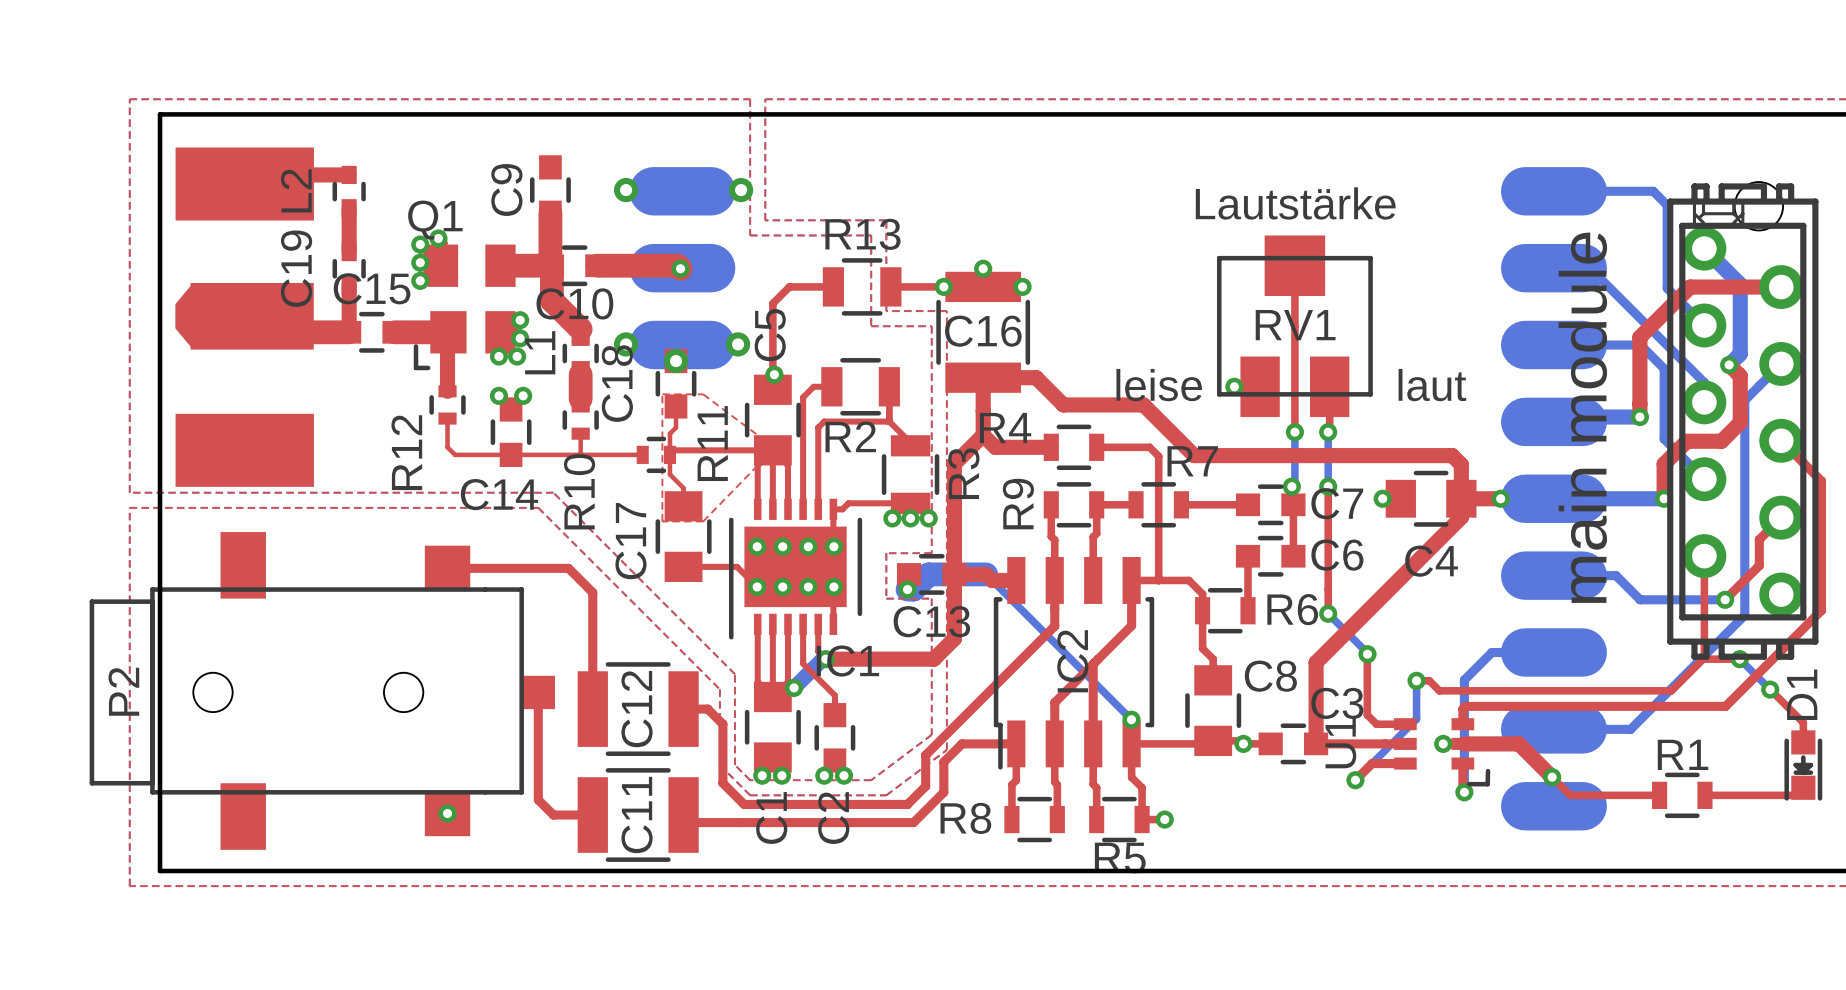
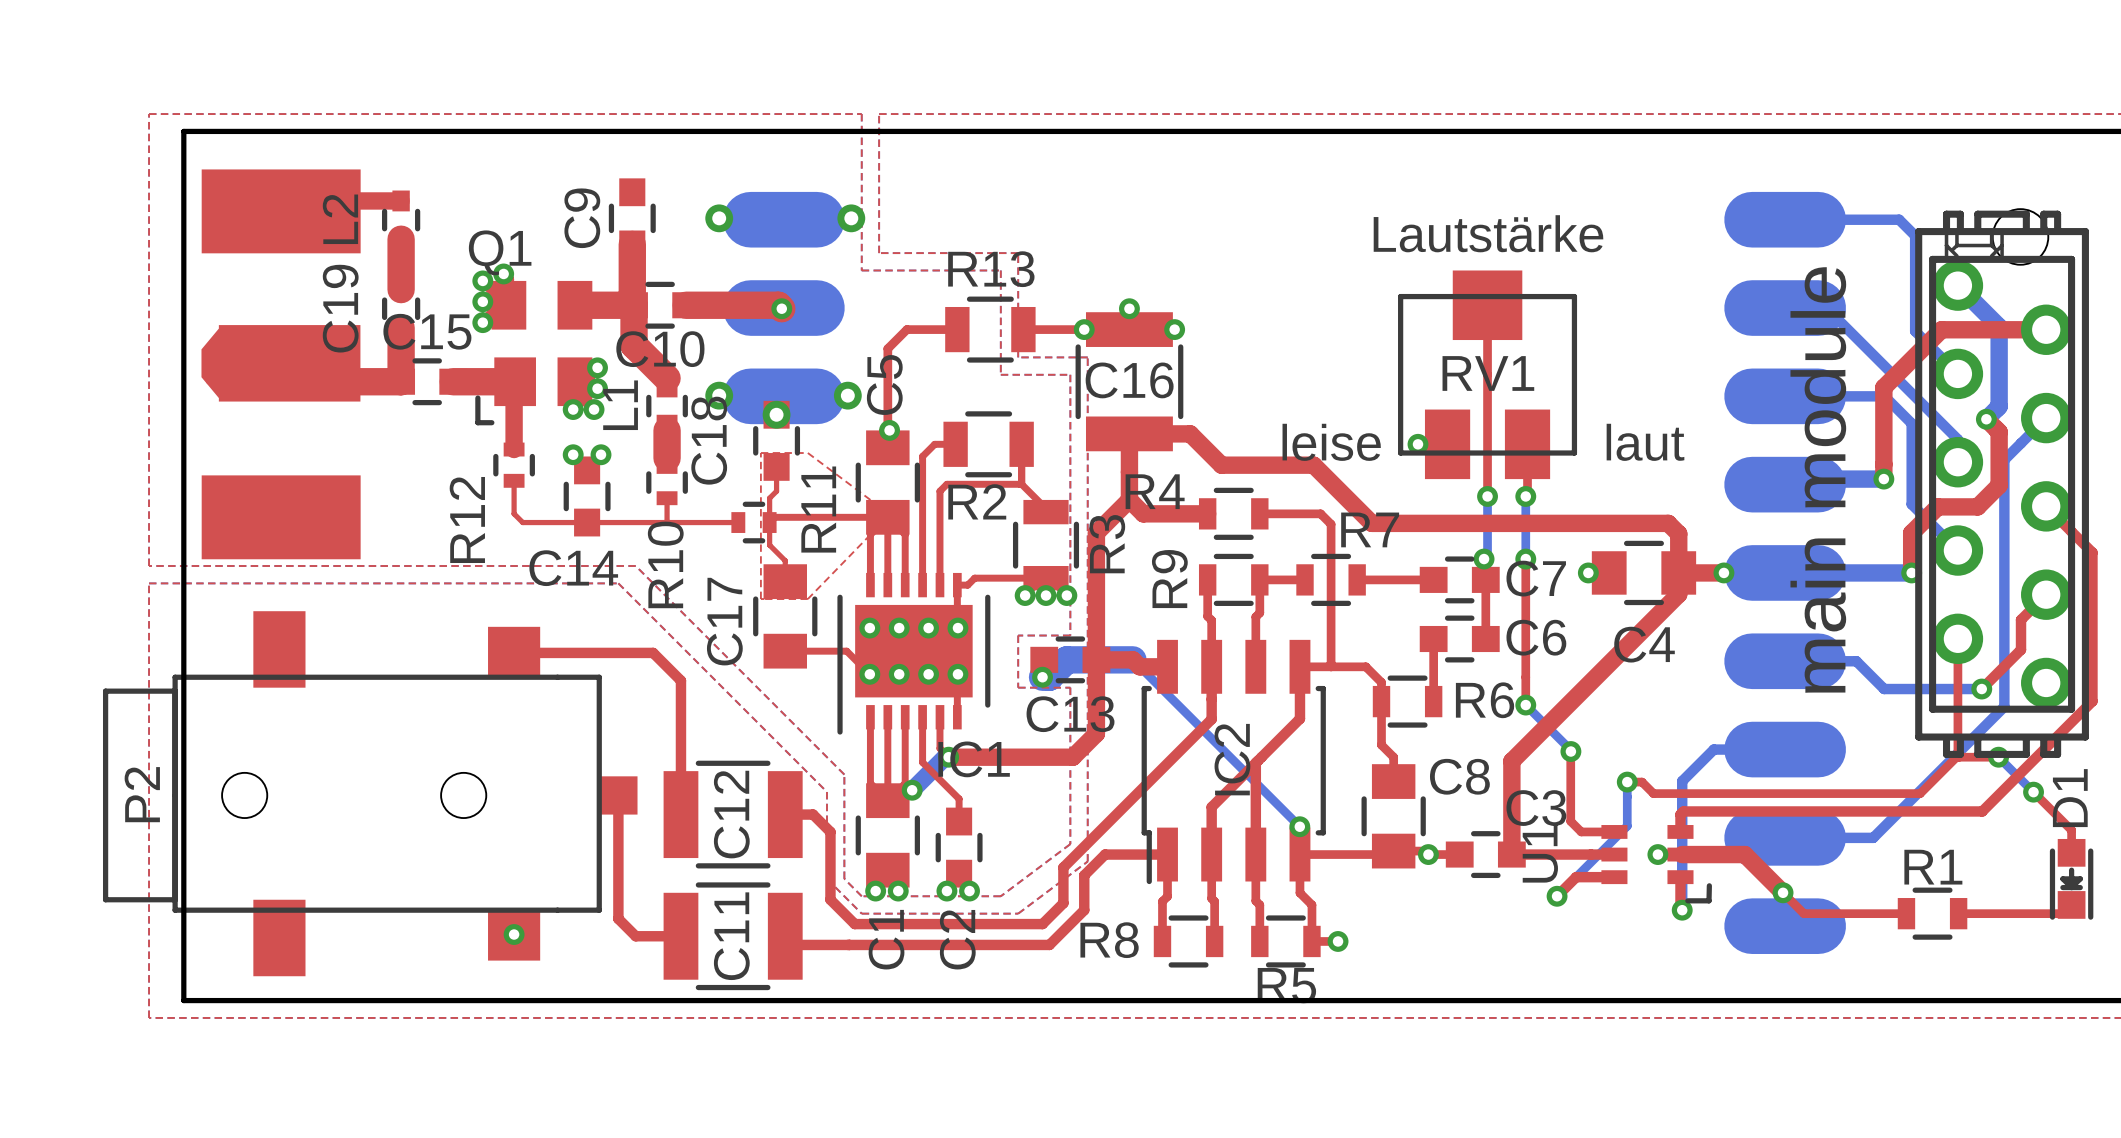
top track width: thin (349, 208) (349, 252) -> thick (401, 239) (401, 289)
top track width: thin (349, 285) (349, 332) -> thick (401, 327) (401, 381)

